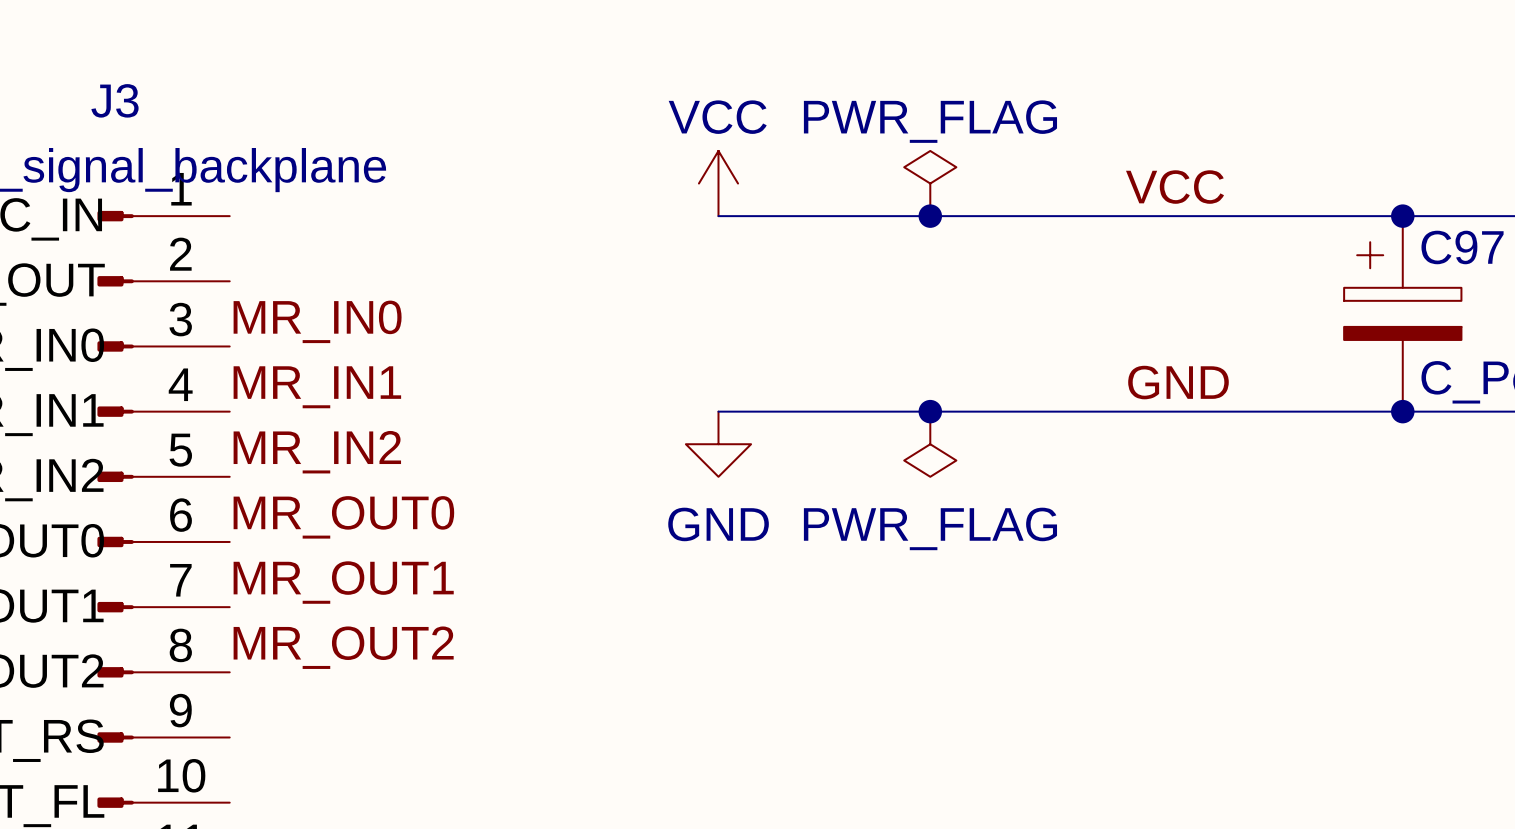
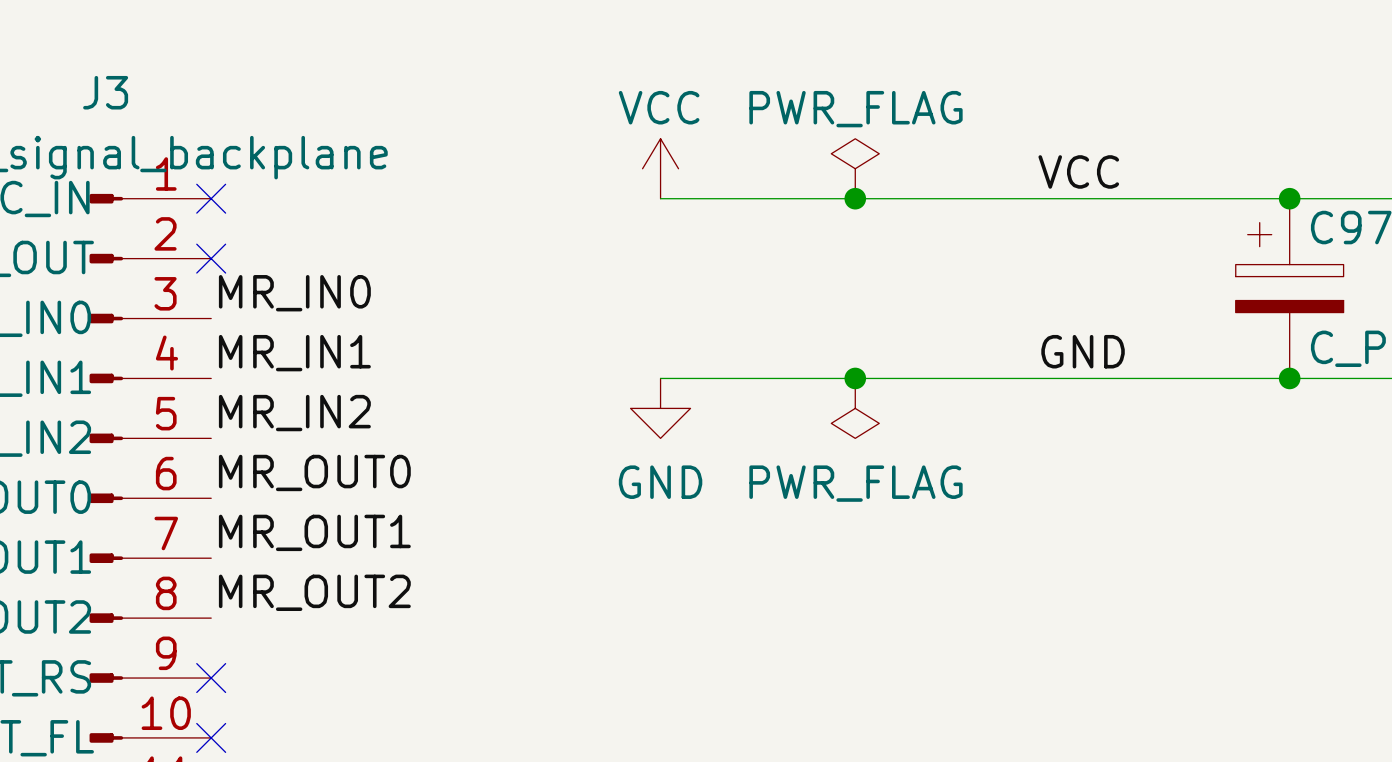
no-connect mark: none -> (211, 198)
no-connect mark: none -> (211, 258)
no-connect mark: none -> (211, 678)
no-connect mark: none -> (211, 737)

